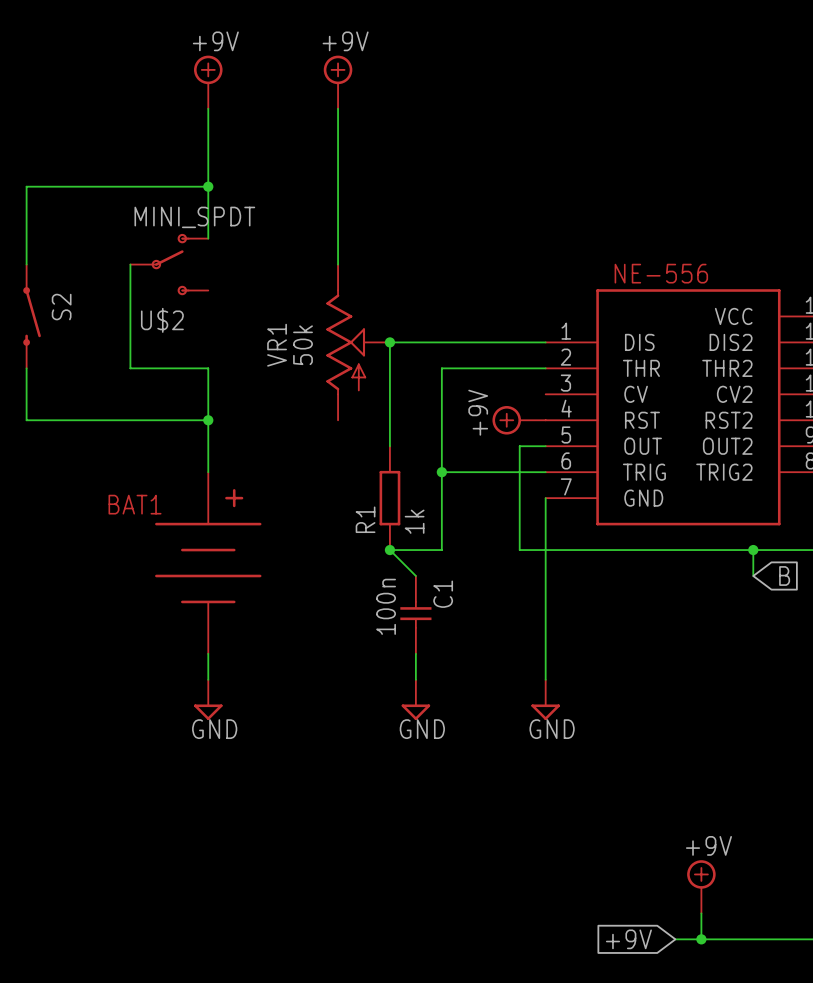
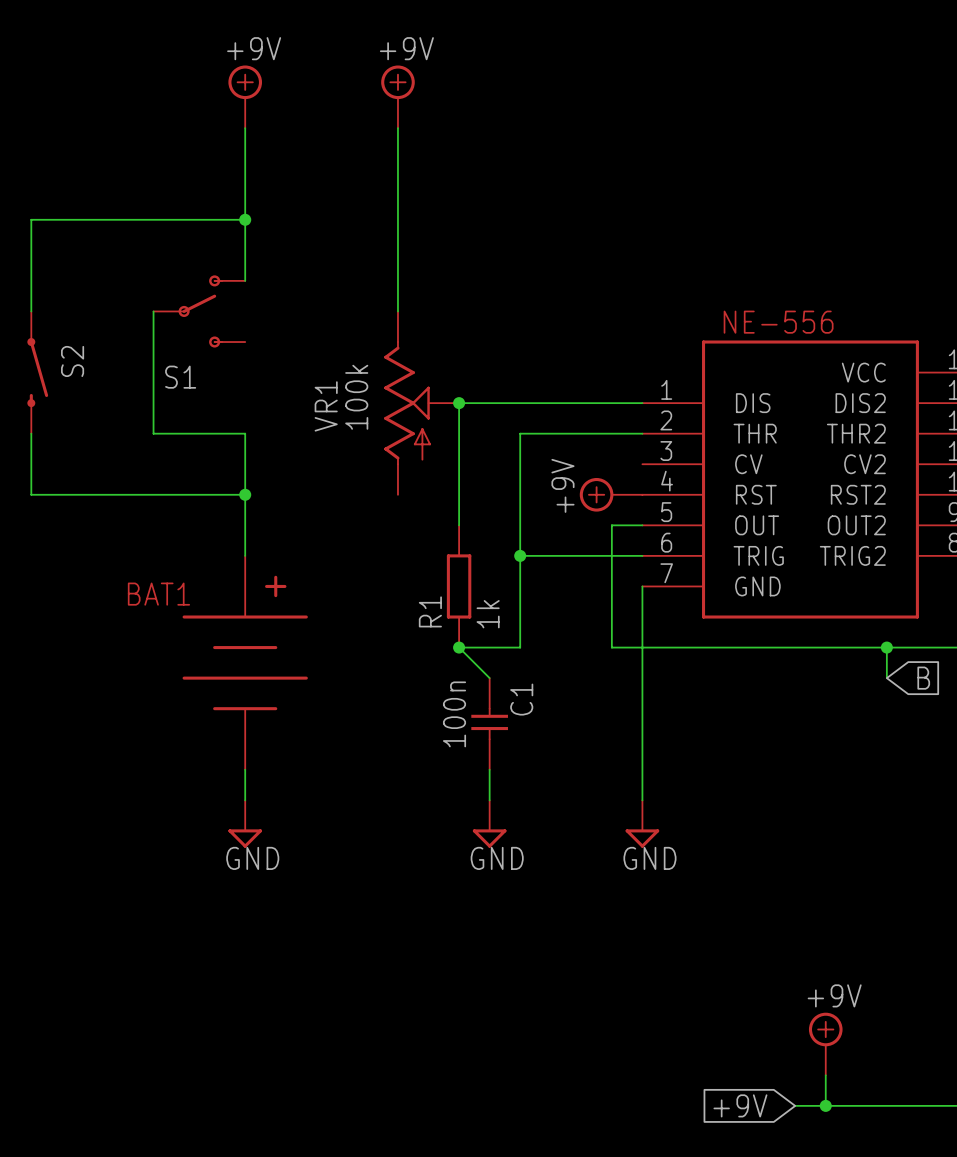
U$2 value: MINI_SPDT (194, 217) -> none
U$2 name: U$2 (162, 320) -> S1 (180, 377)
VR1 value: 50k (303, 345) -> 100k (356, 397)

